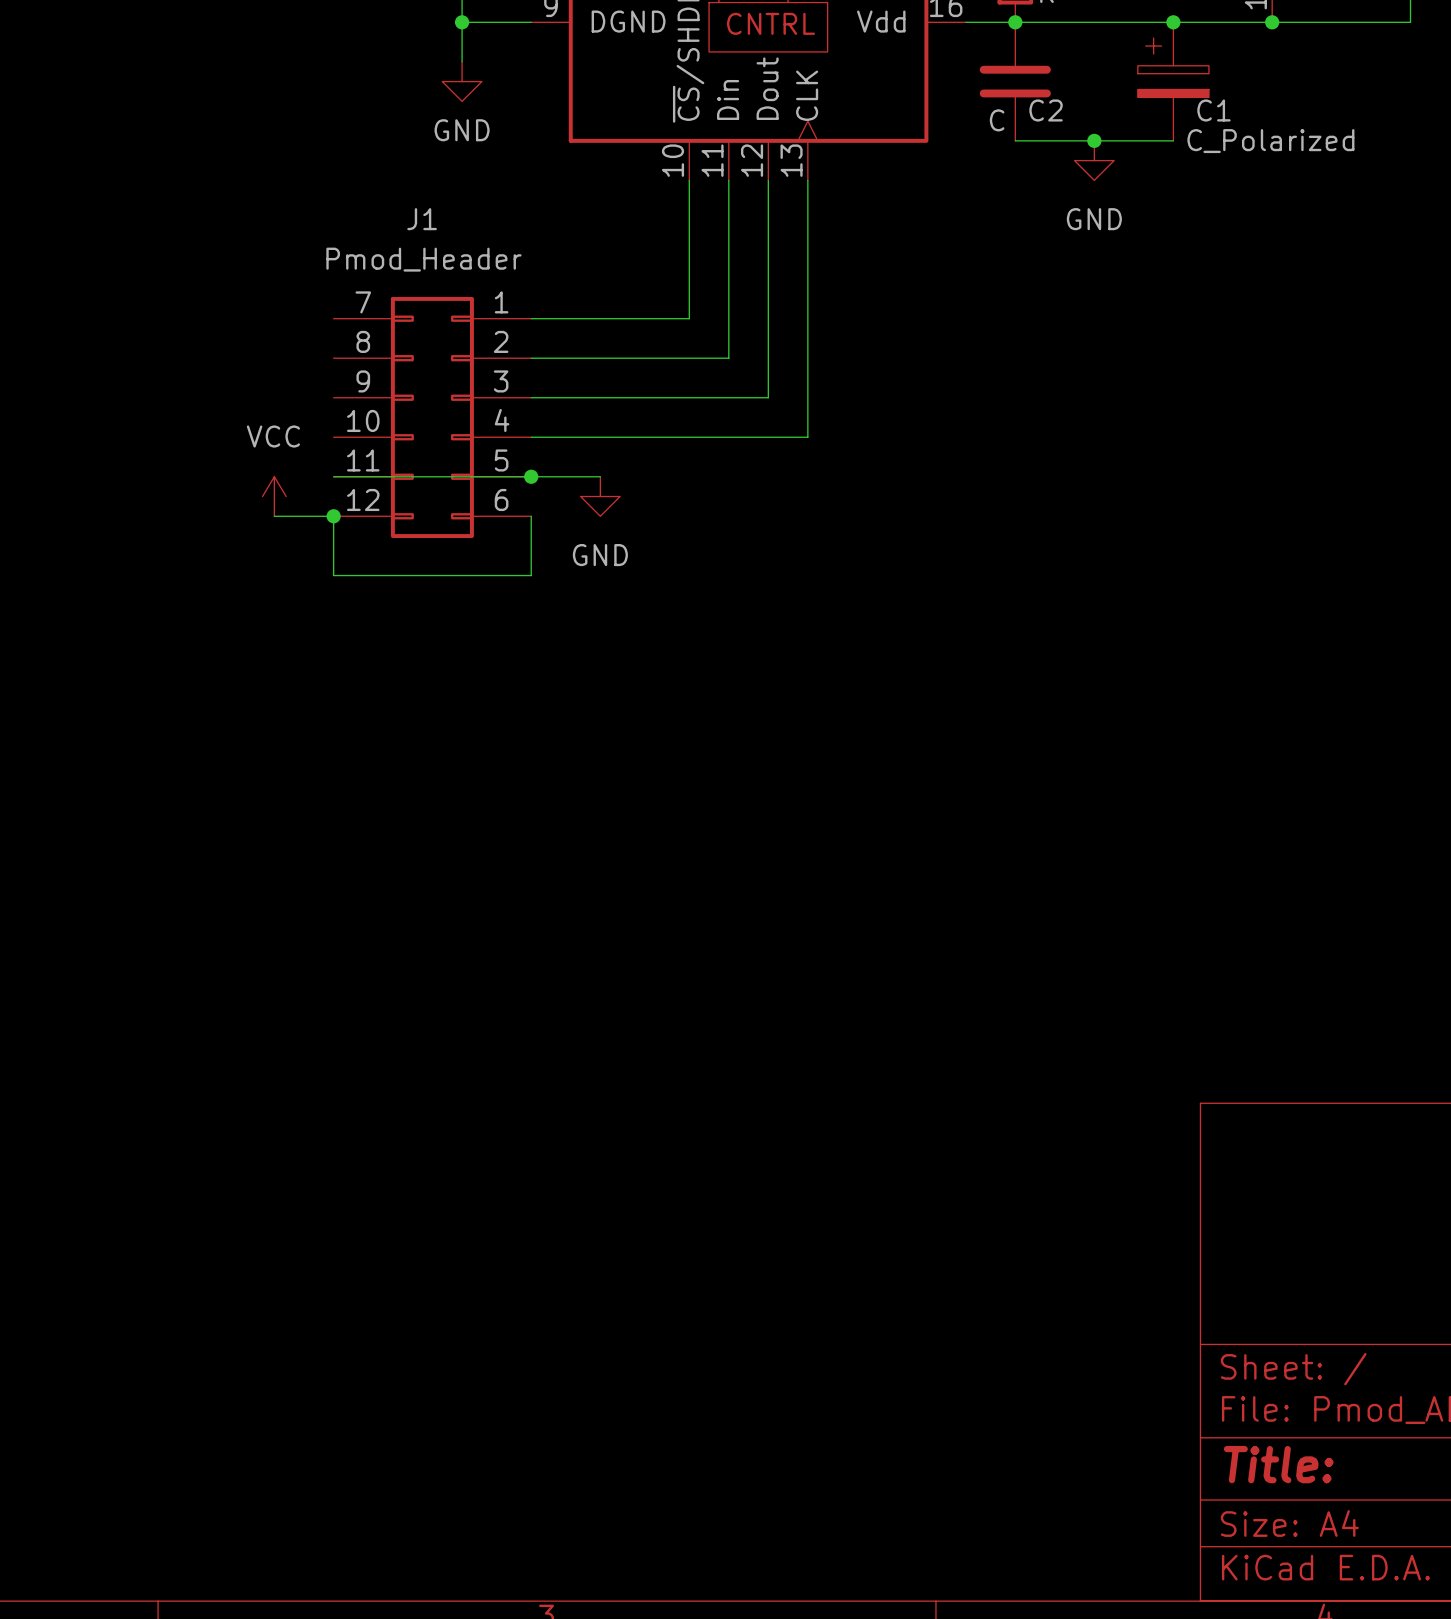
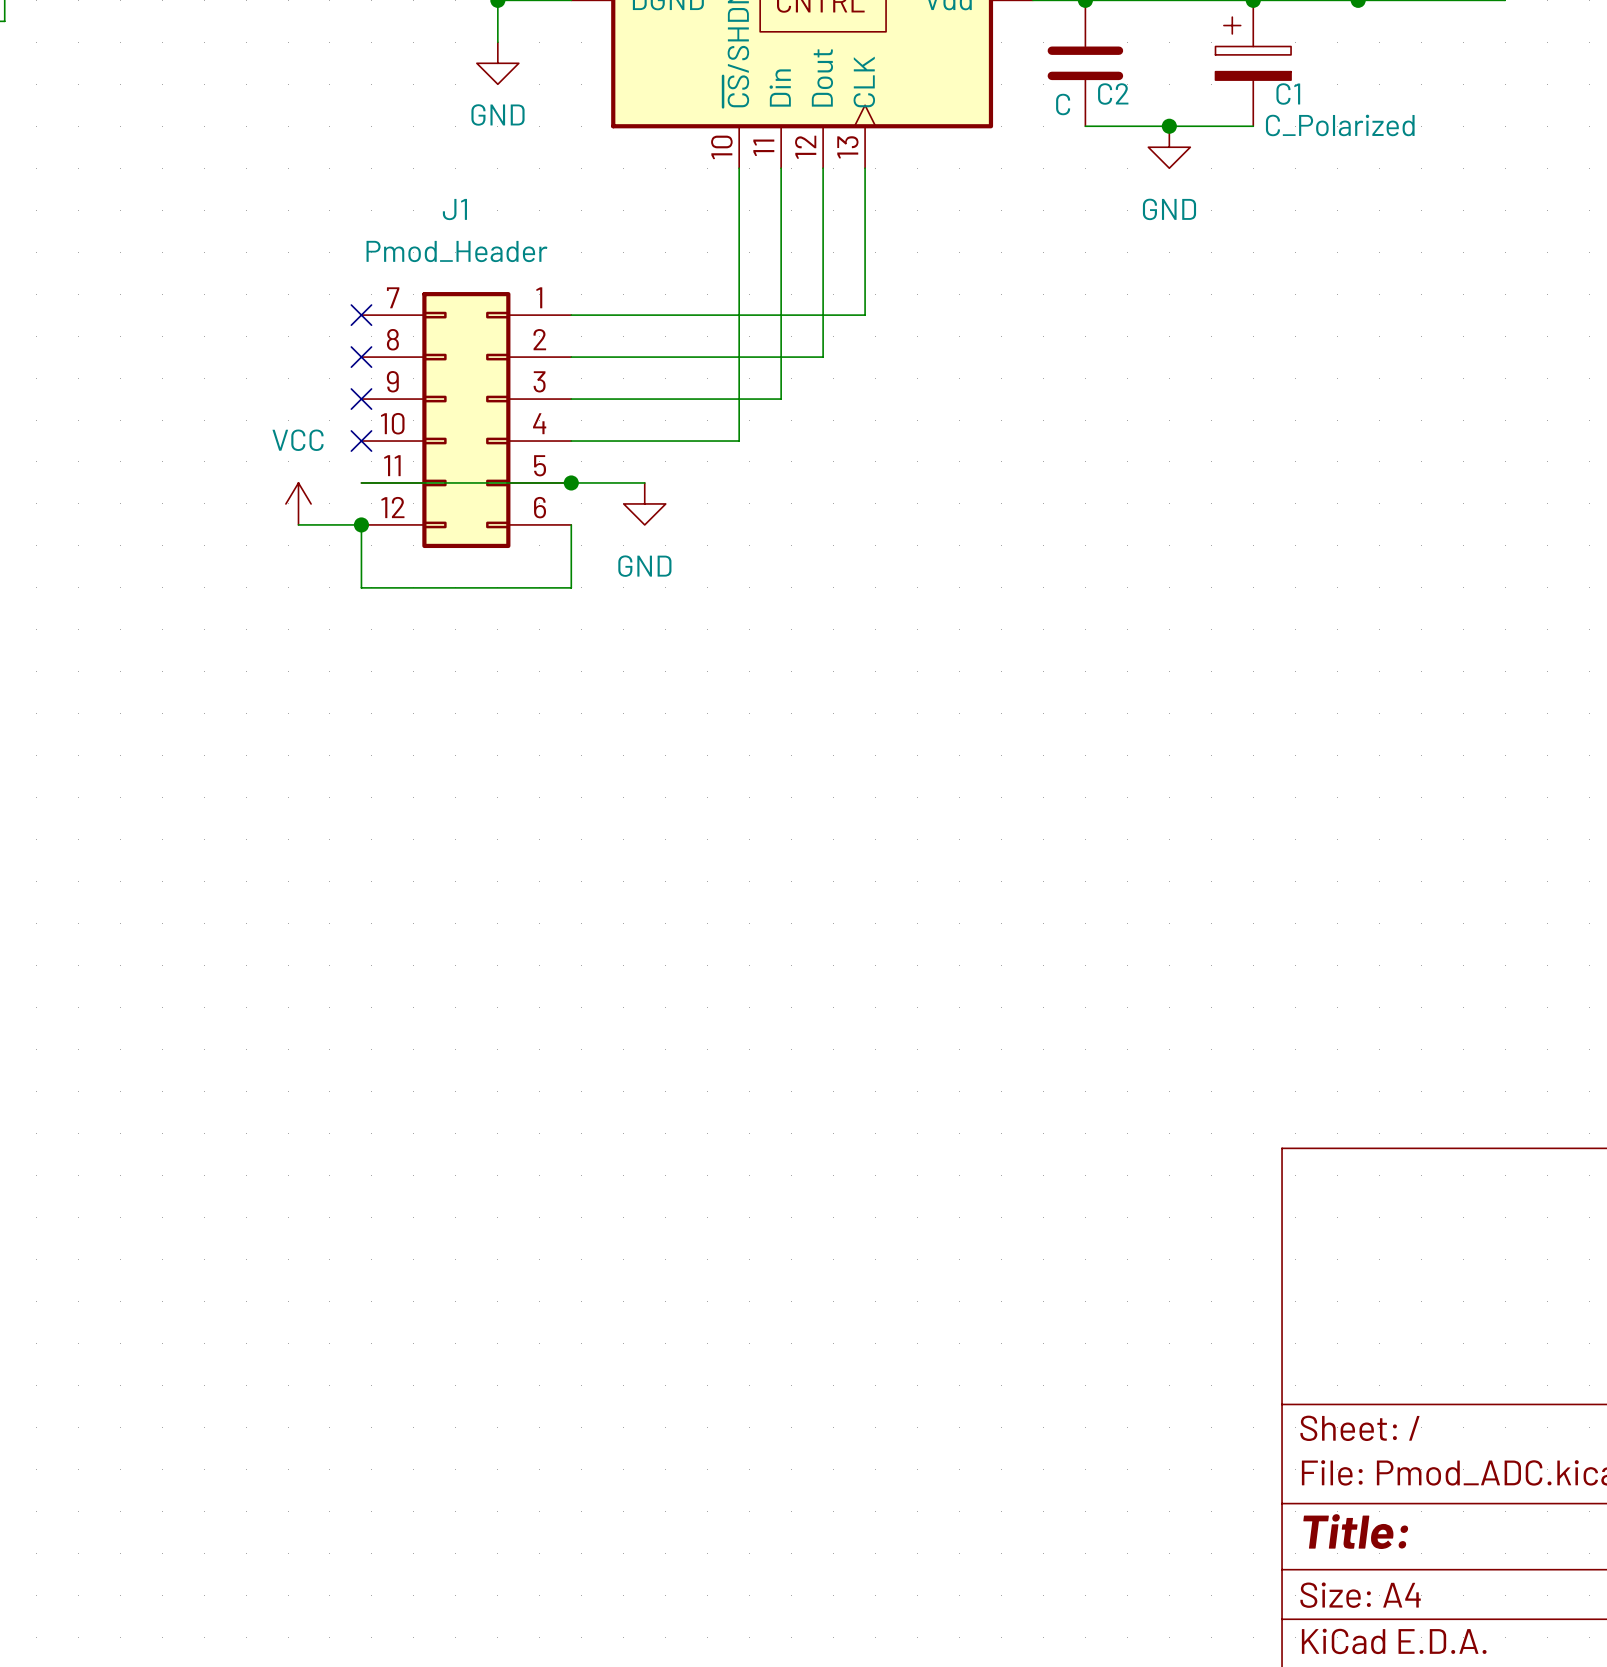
no-connect mark: none -> (361, 315)
wire: (807, 318) (807, 437) (689, 437) -> (865, 315) (739, 315) (739, 441)
no-connect mark: none -> (361, 357)
wire: (768, 358) (768, 397) (728, 397) -> (823, 357) (781, 357) (781, 399)
no-connect mark: none -> (361, 399)
no-connect mark: none -> (361, 441)

